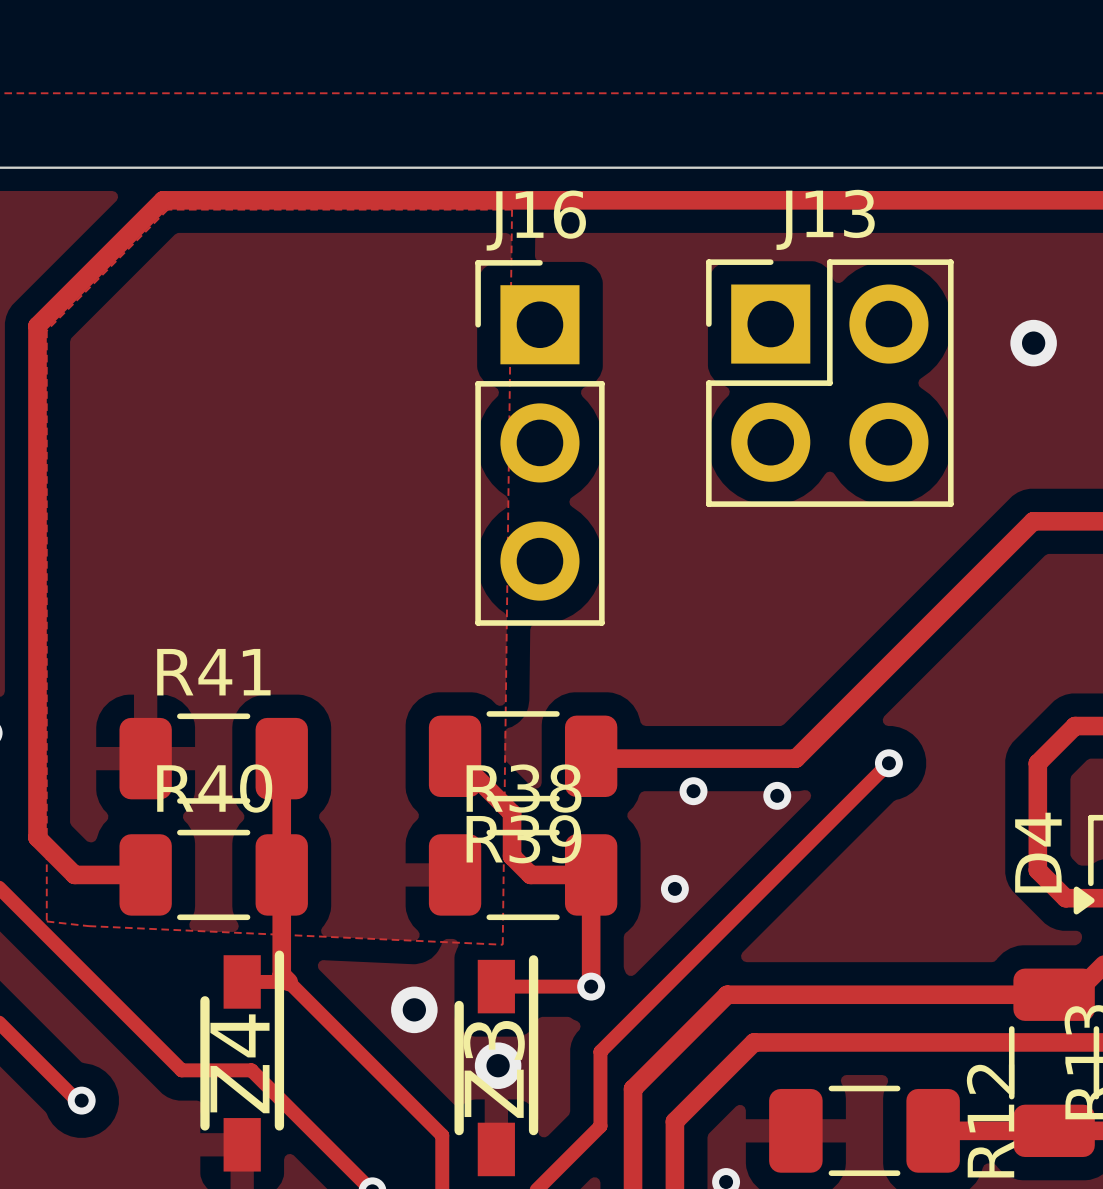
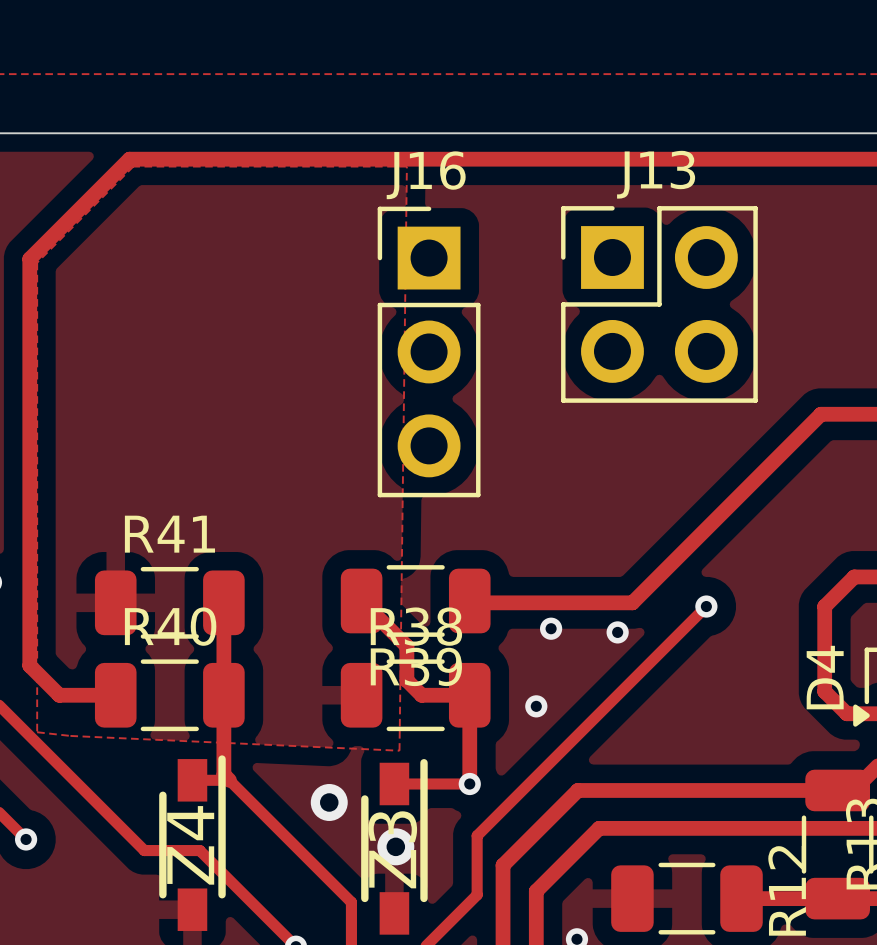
via: (1033, 343) -> none
track: (32, 1056) (77, 1100) (81, 1100) -> none
via position: (81, 1100) -> (26, 839)

